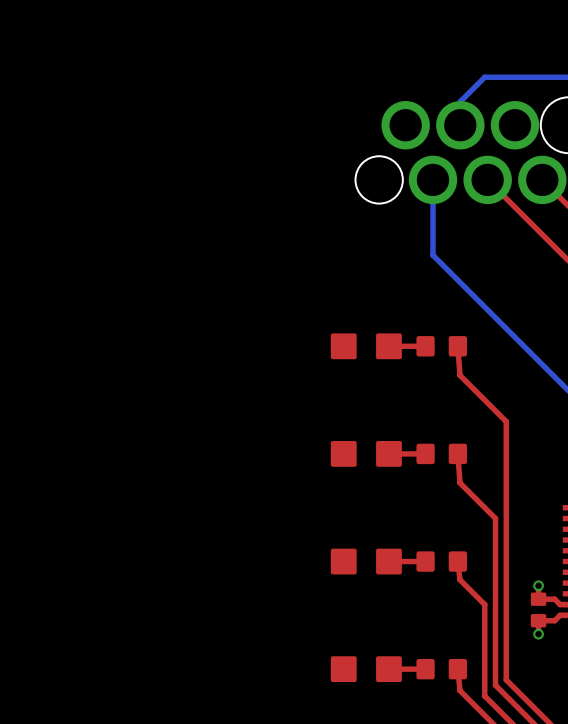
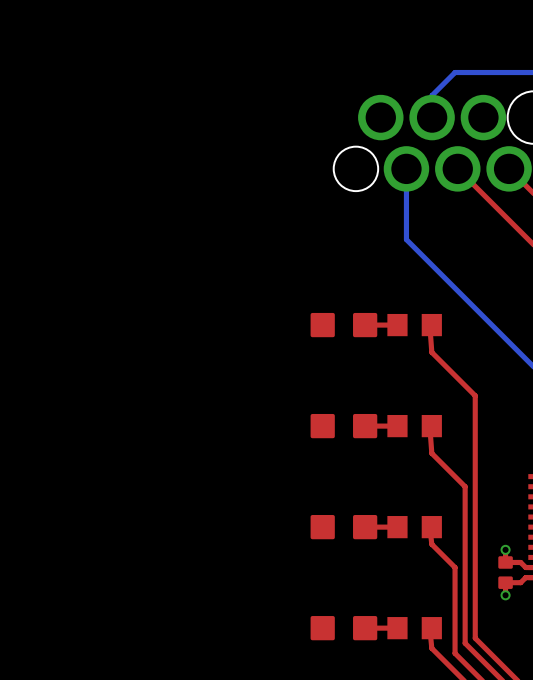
part footprint: [416, 336, 468, 357] -> [387, 313, 442, 337]
part footprint: [416, 443, 468, 465] -> [387, 414, 442, 438]
part footprint: [416, 551, 468, 572] -> [387, 516, 442, 539]
part footprint: [416, 658, 468, 680] -> [387, 617, 442, 640]

